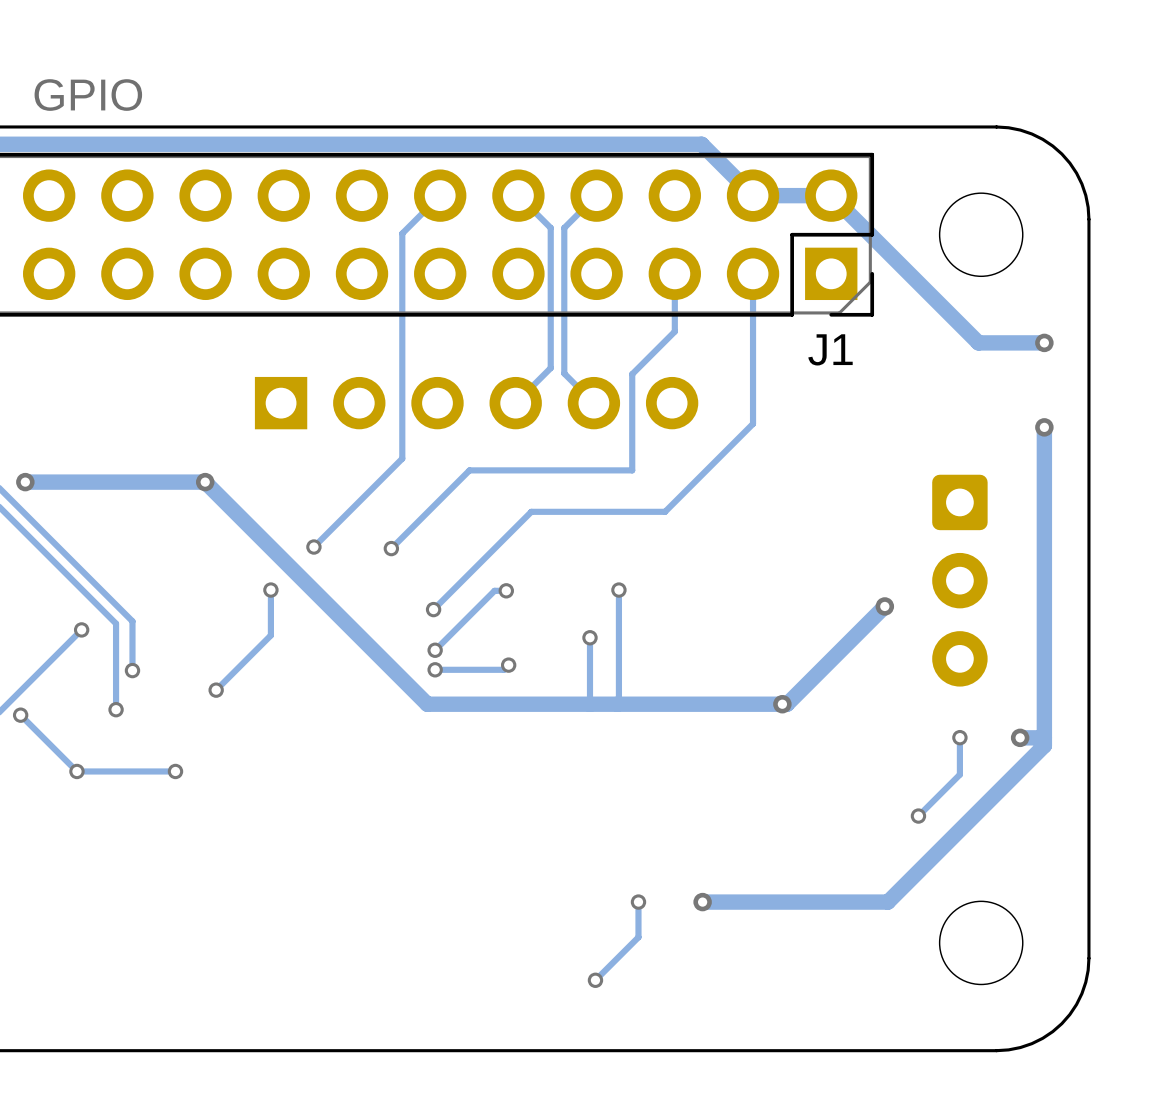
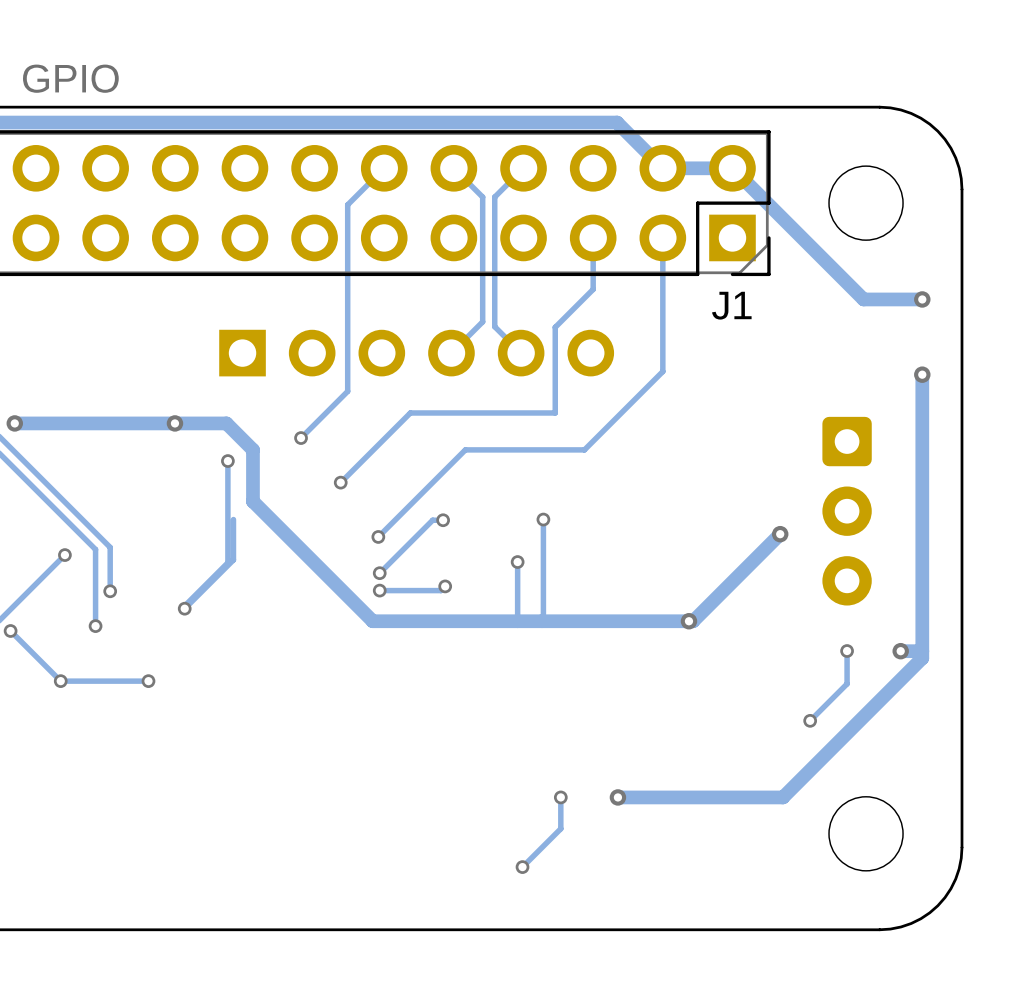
track: (402, 233) (402, 458) (313, 547) -> (350, 202) (347, 204) (347, 391) (301, 438)
track: (205, 482) (292, 569) -> (174, 423) (226, 423) (252, 449) (252, 501)
via: none -> (301, 438)
track: none -> (227, 461) (227, 562) (181, 608)
via: none -> (227, 461)
via: (313, 547) -> none
via: (270, 590) -> none

